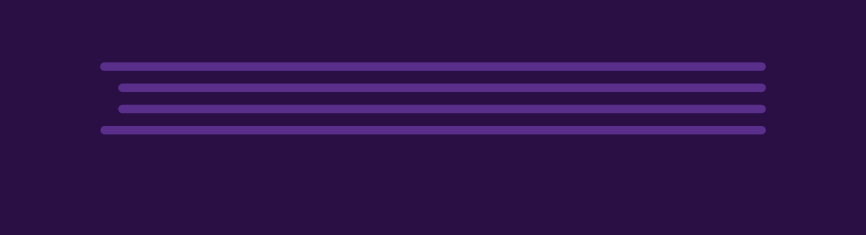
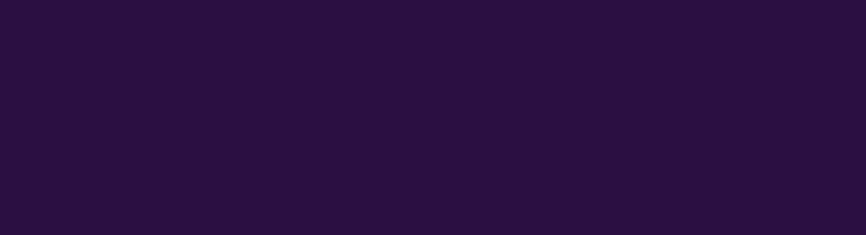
track: (761, 66) (104, 66) -> none
track: (761, 87) (122, 87) -> none
track: (761, 108) (122, 108) -> none
track: (761, 130) (104, 130) -> none

